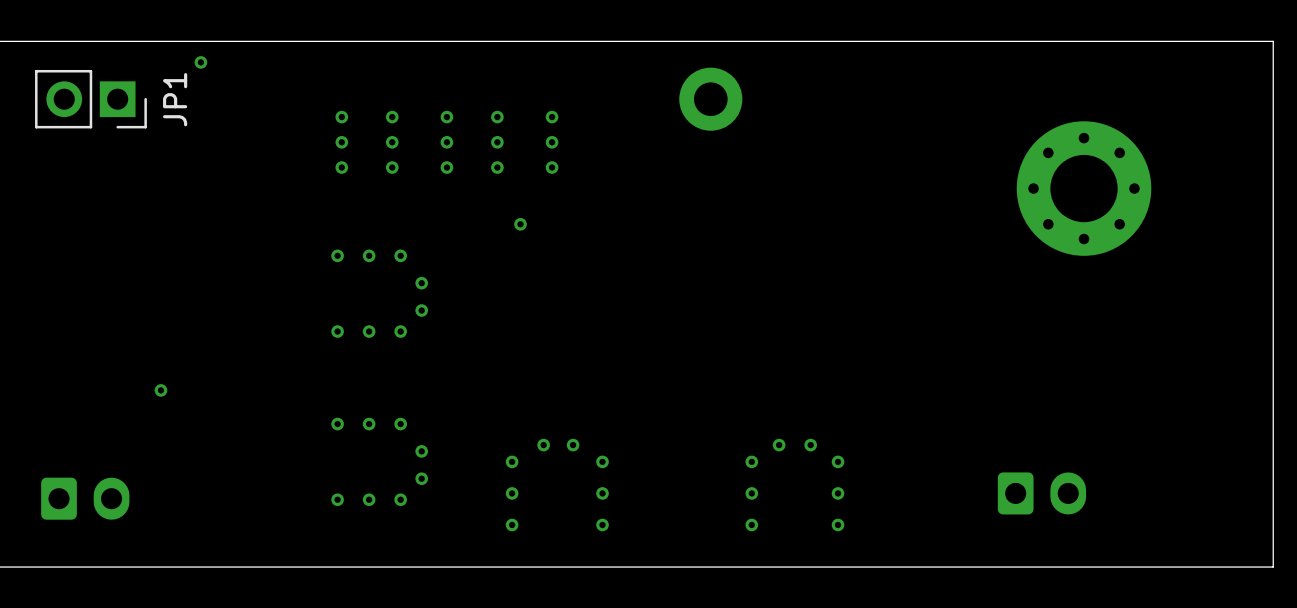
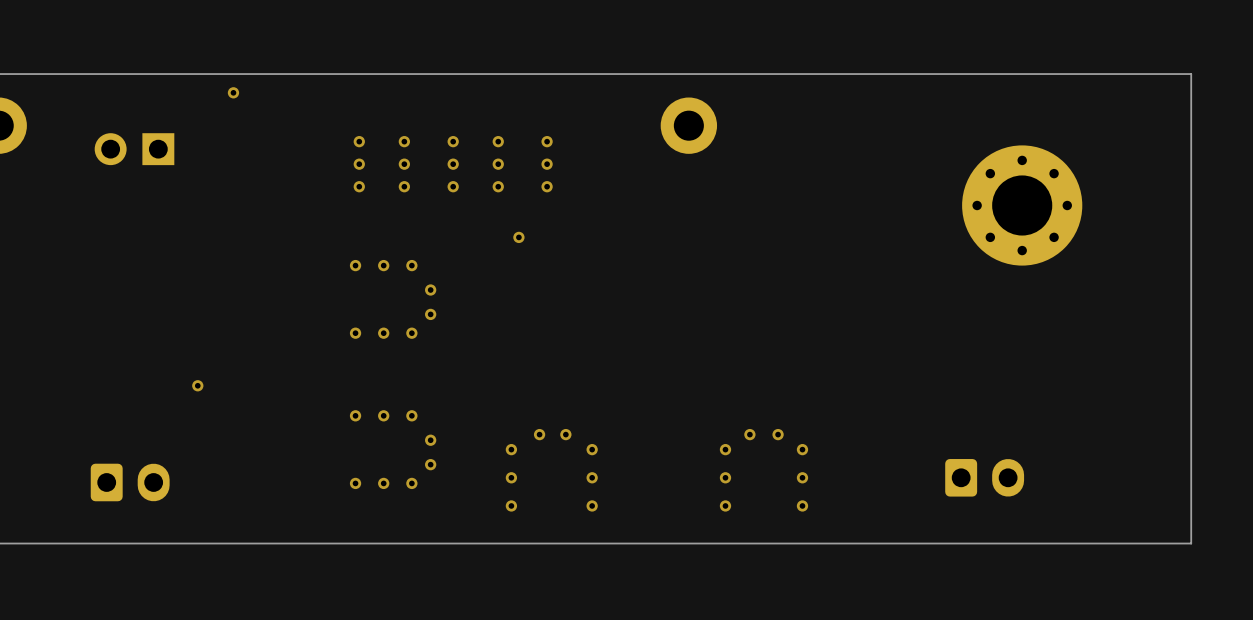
JP1 side: top (90, 99) -> bottom (134, 149)

